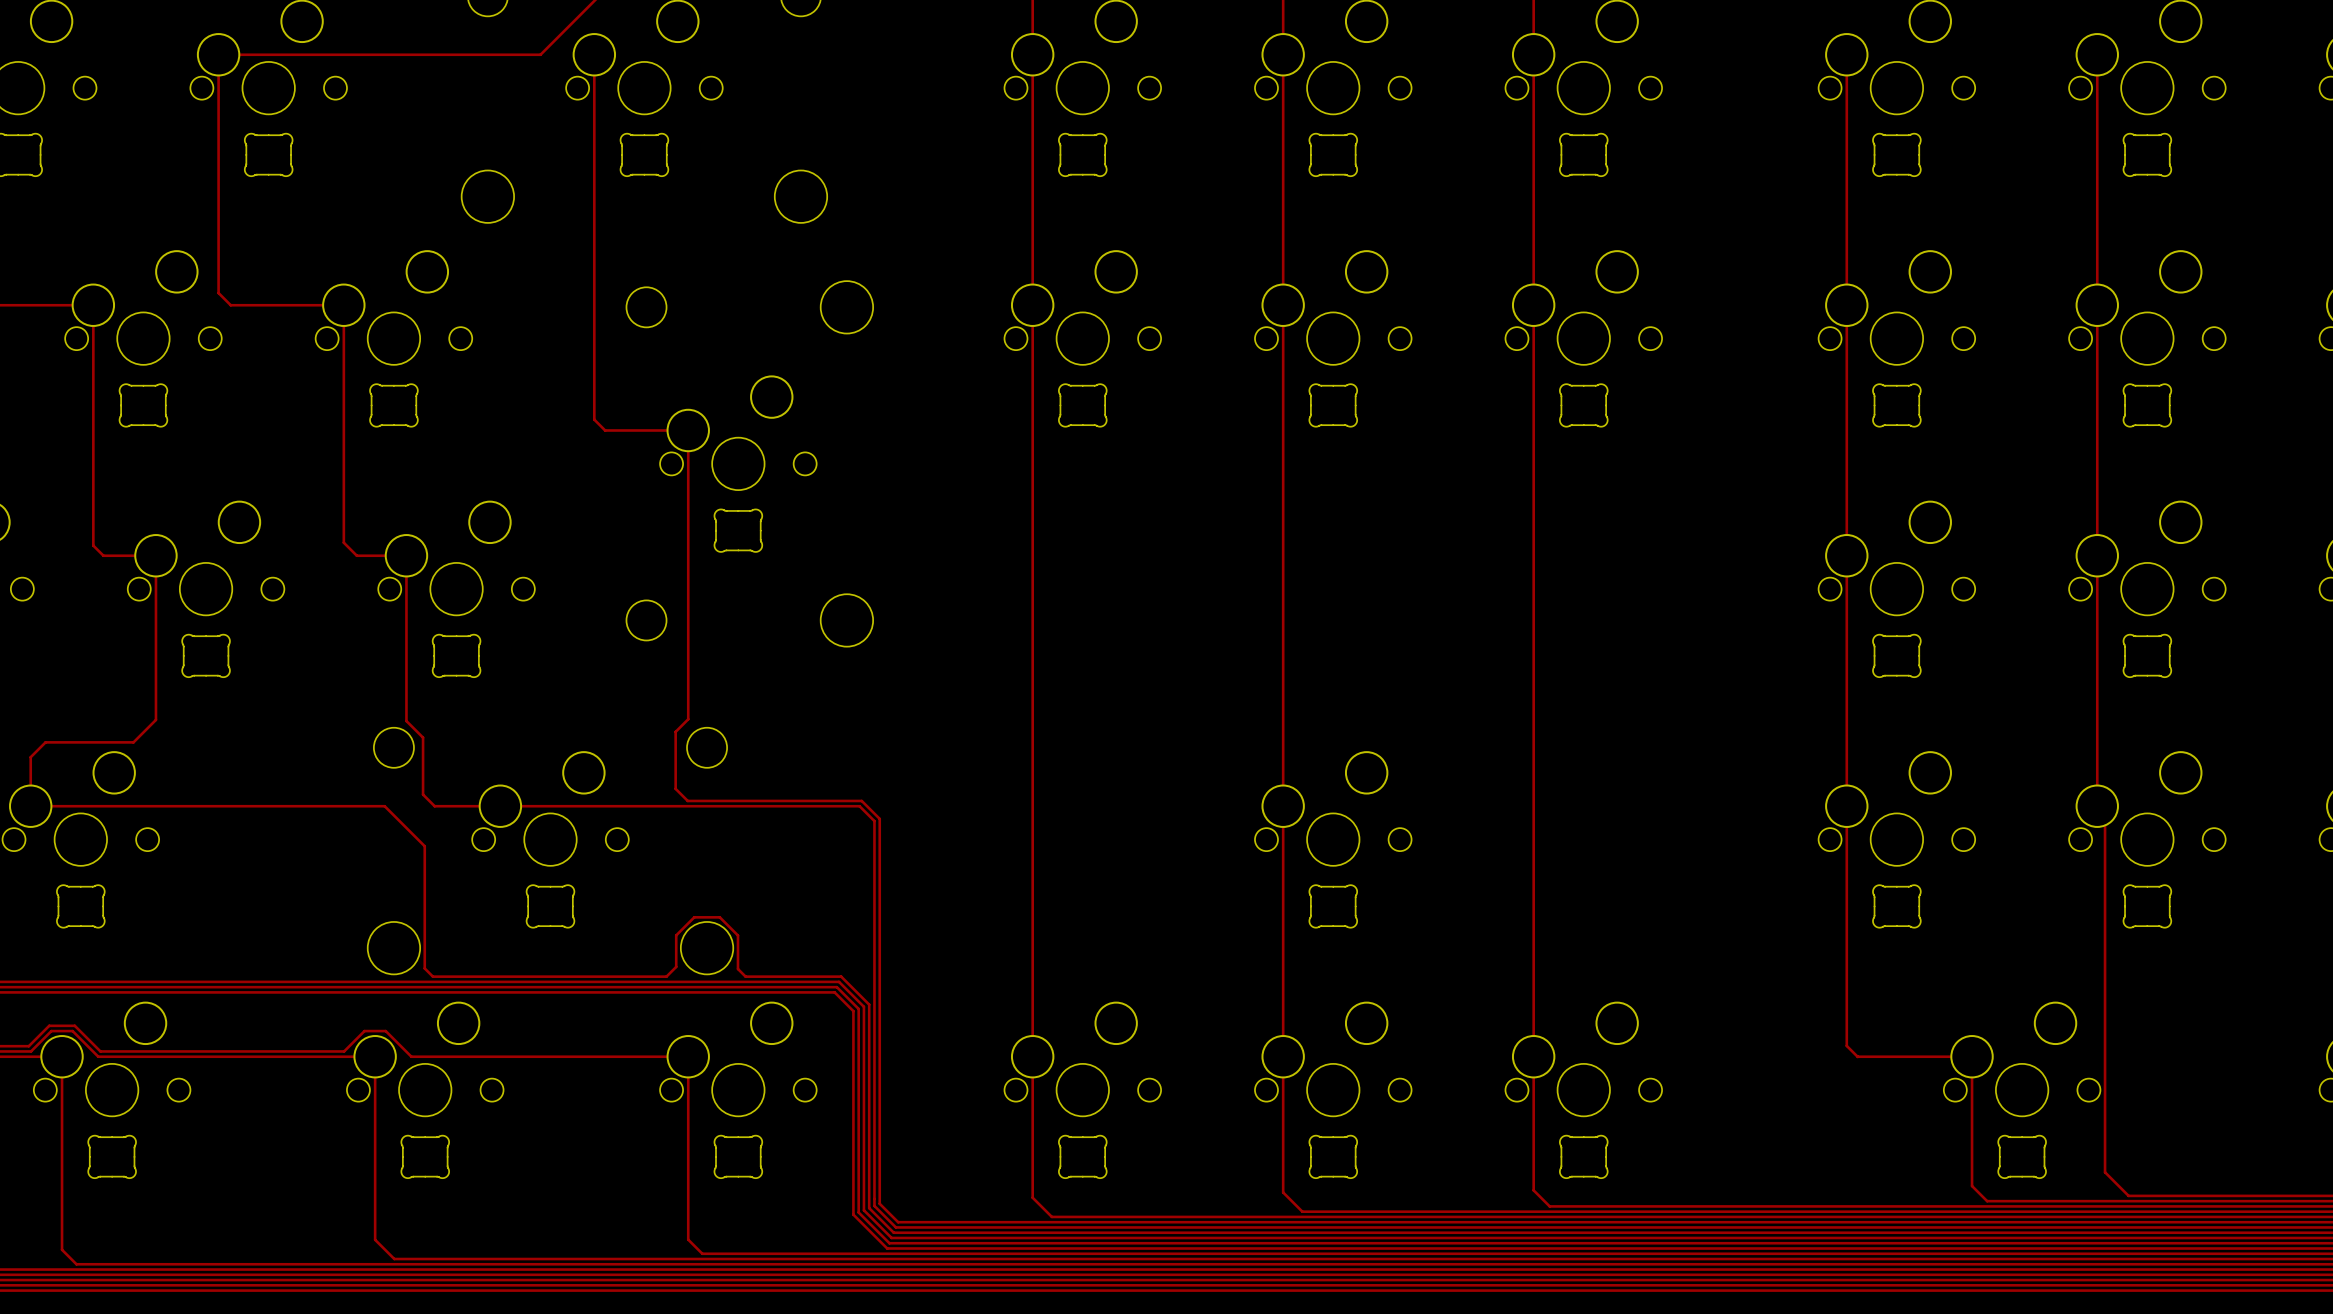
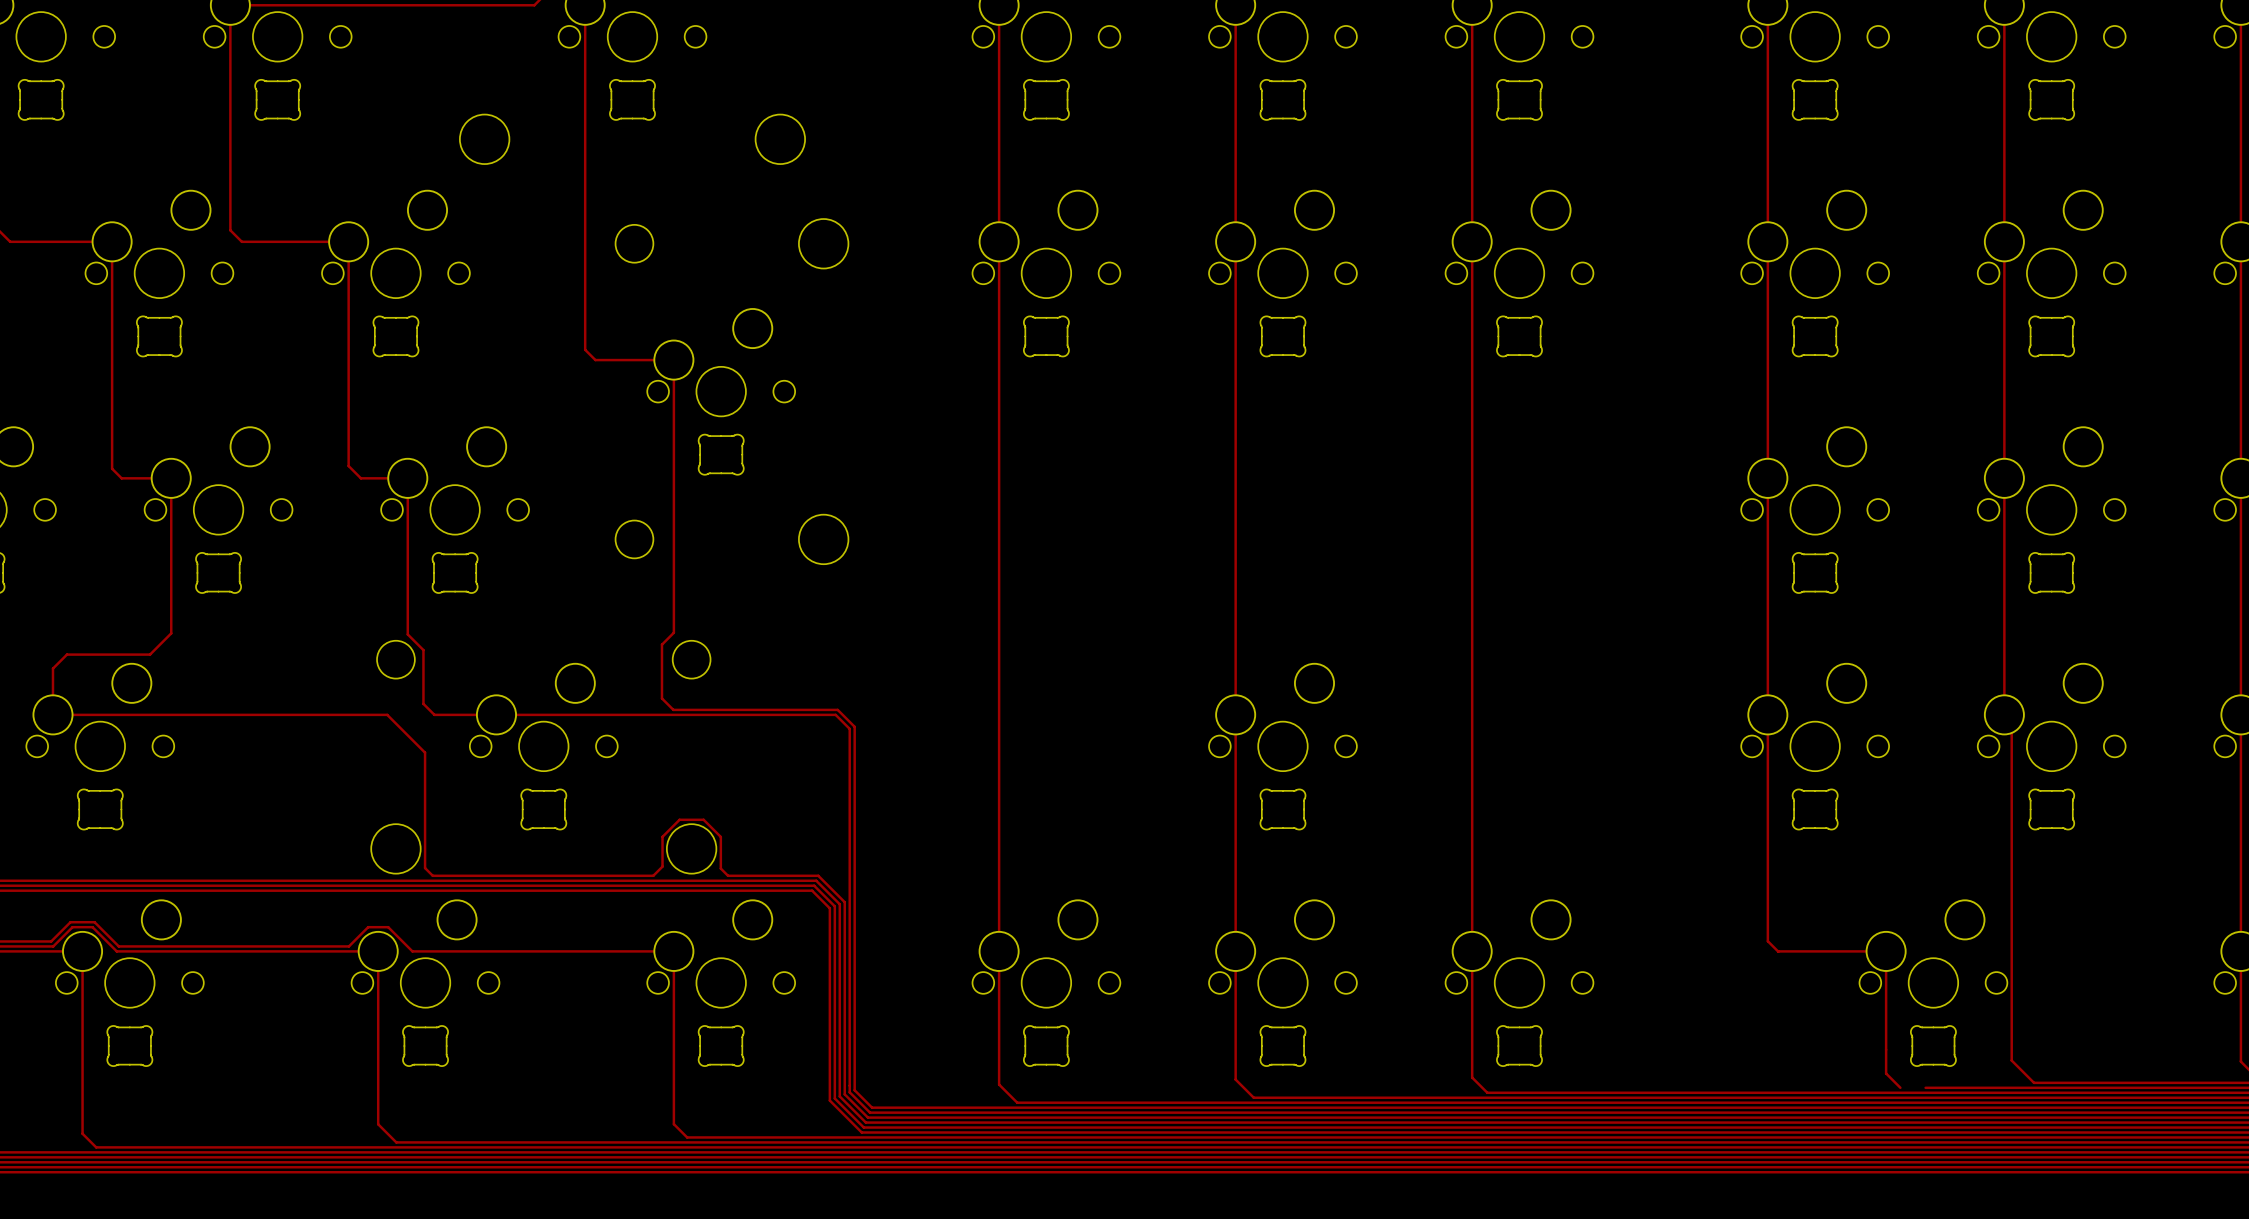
track: (1987, 1201) (2013, 1201) -> none

